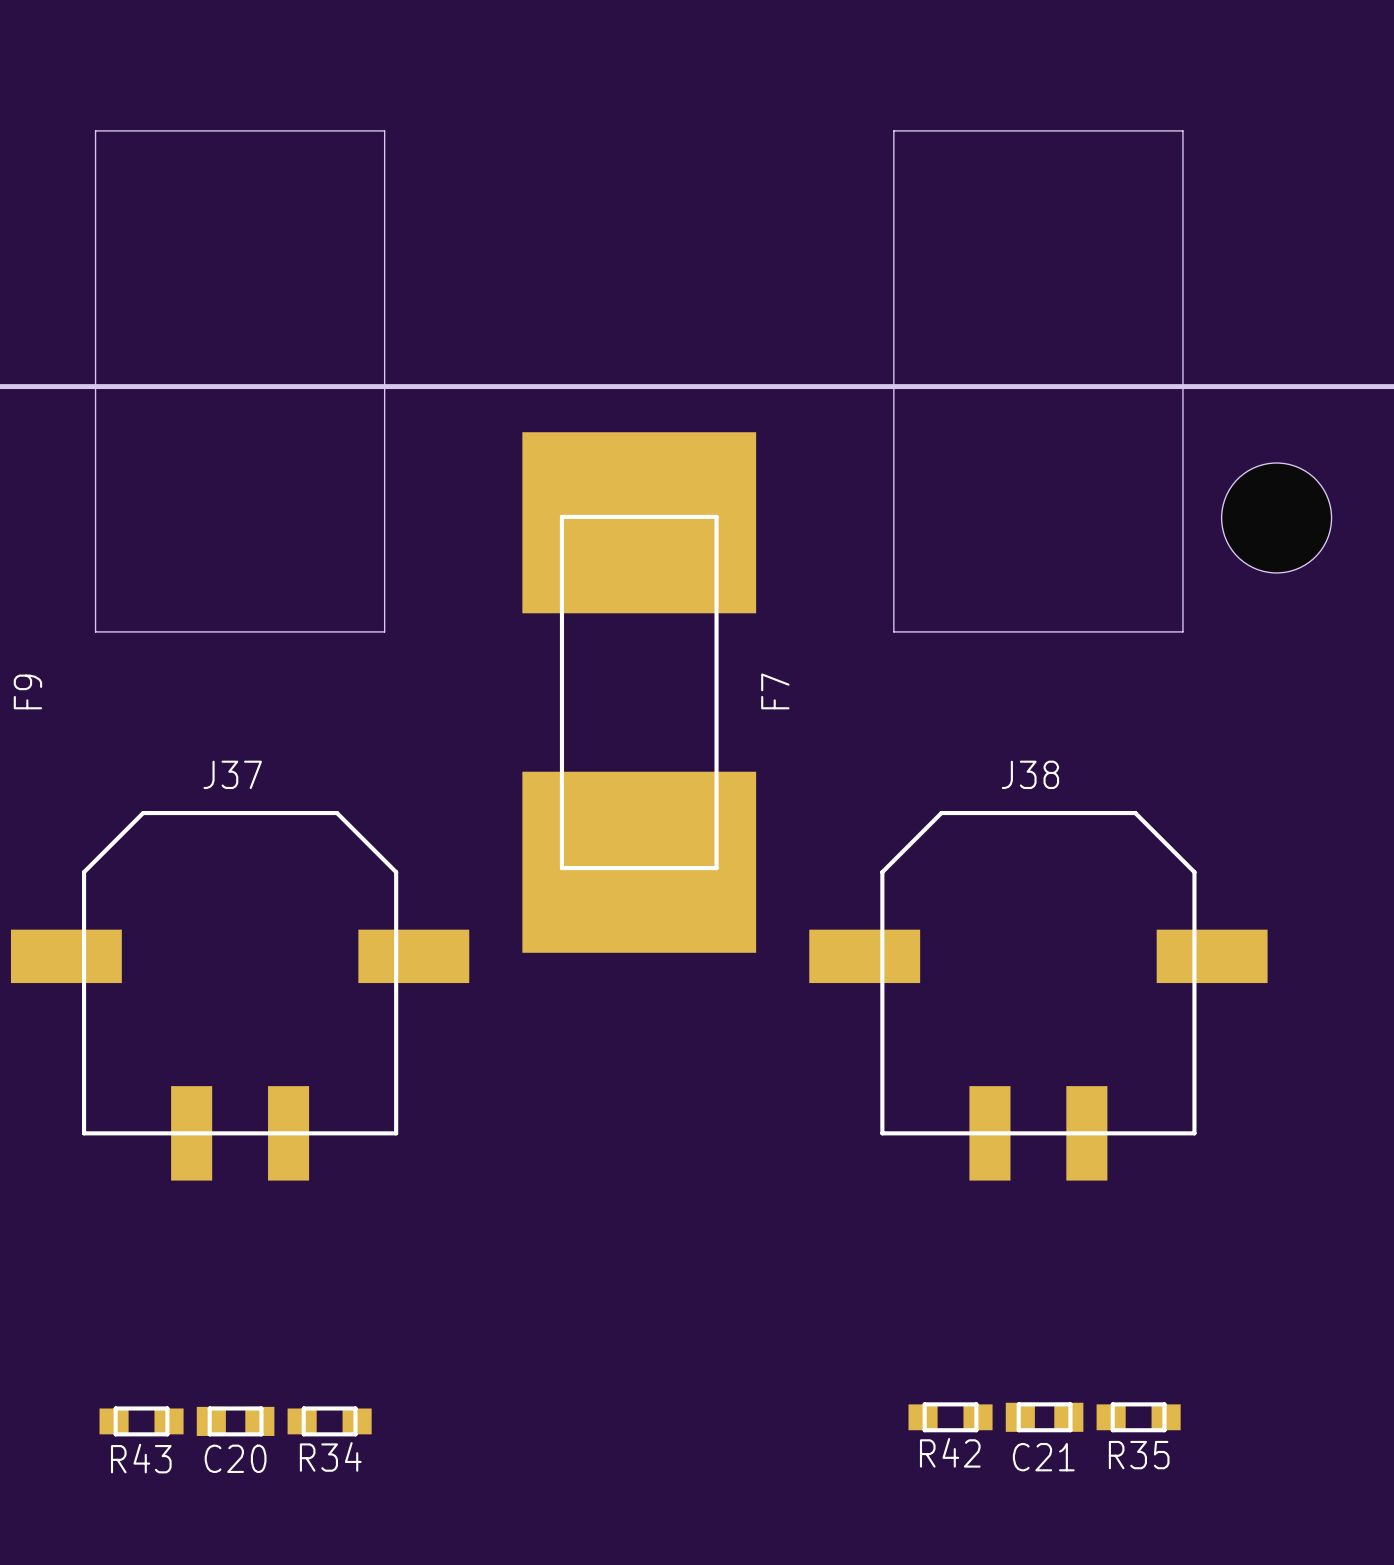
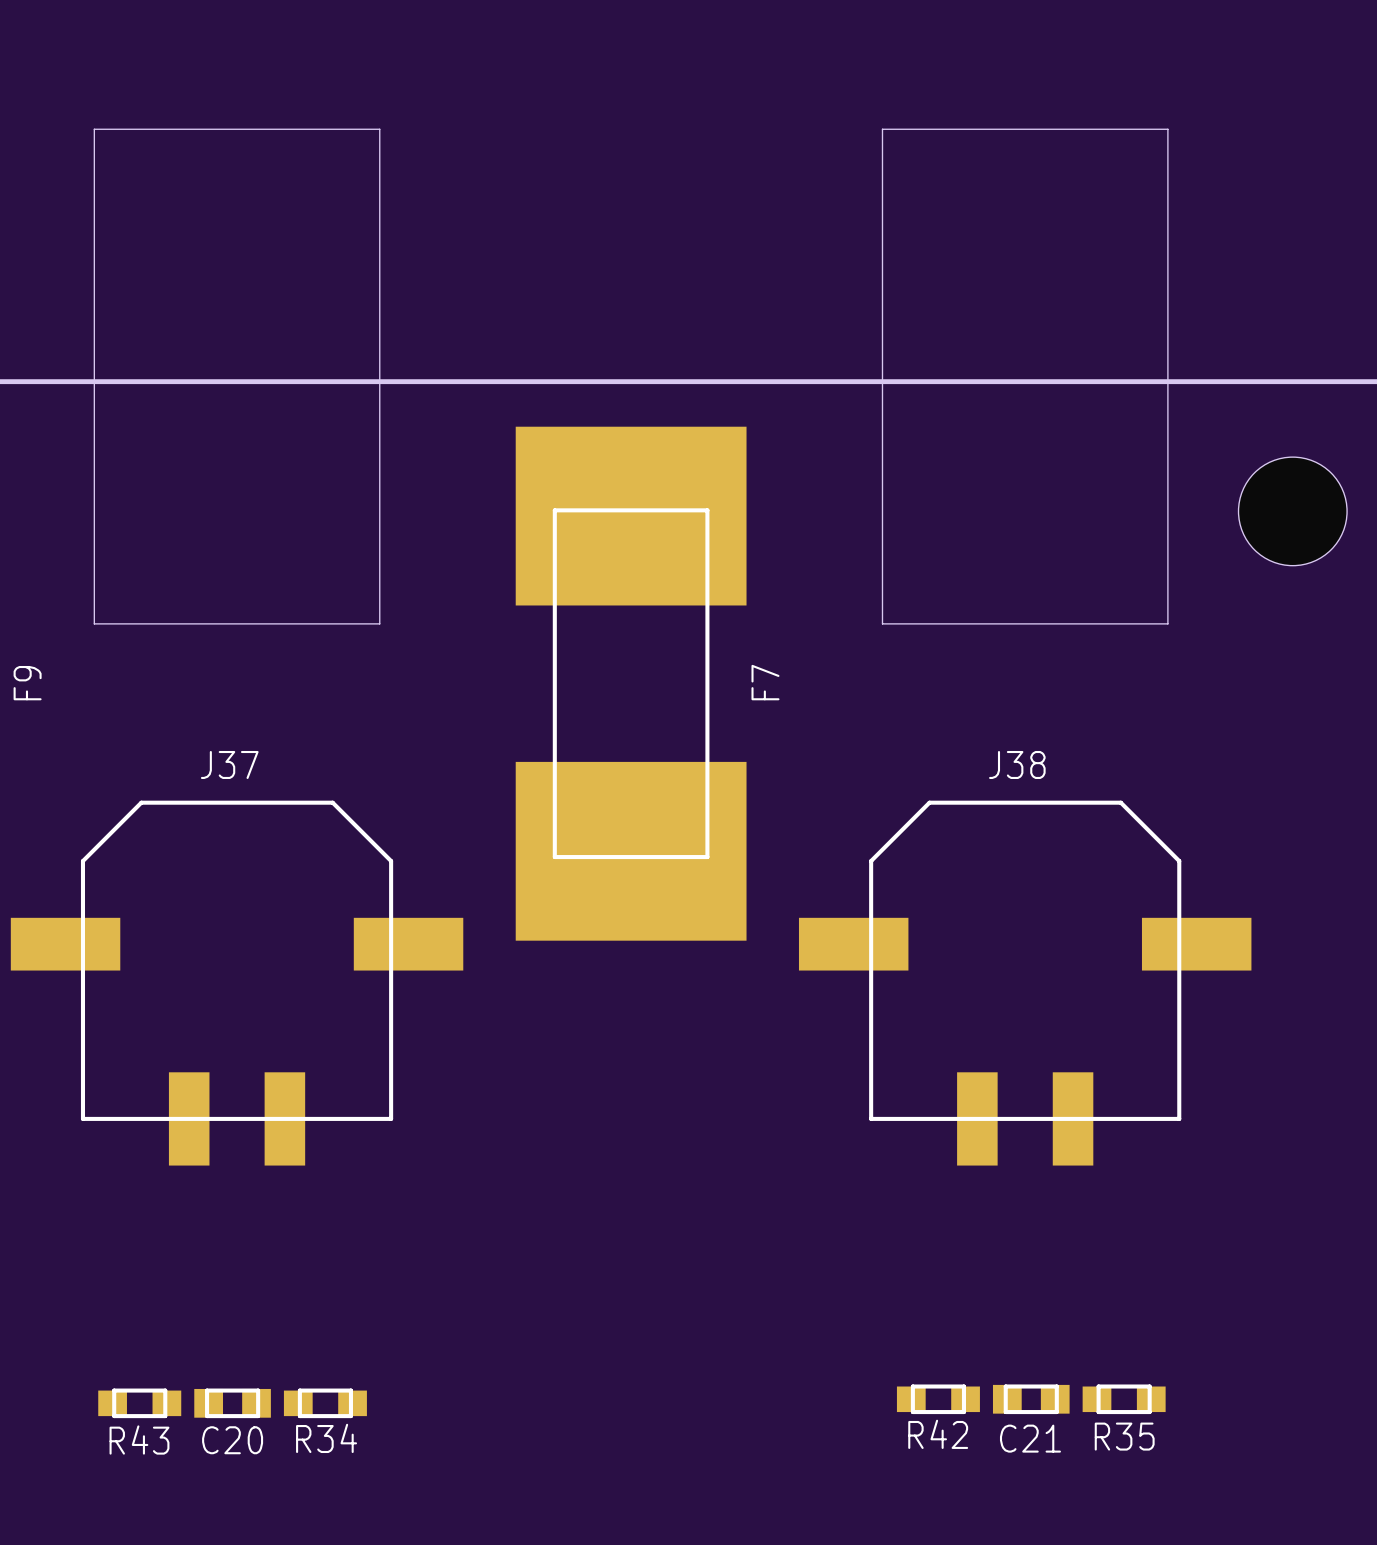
part position: (1276, 517) -> (1292, 511)

